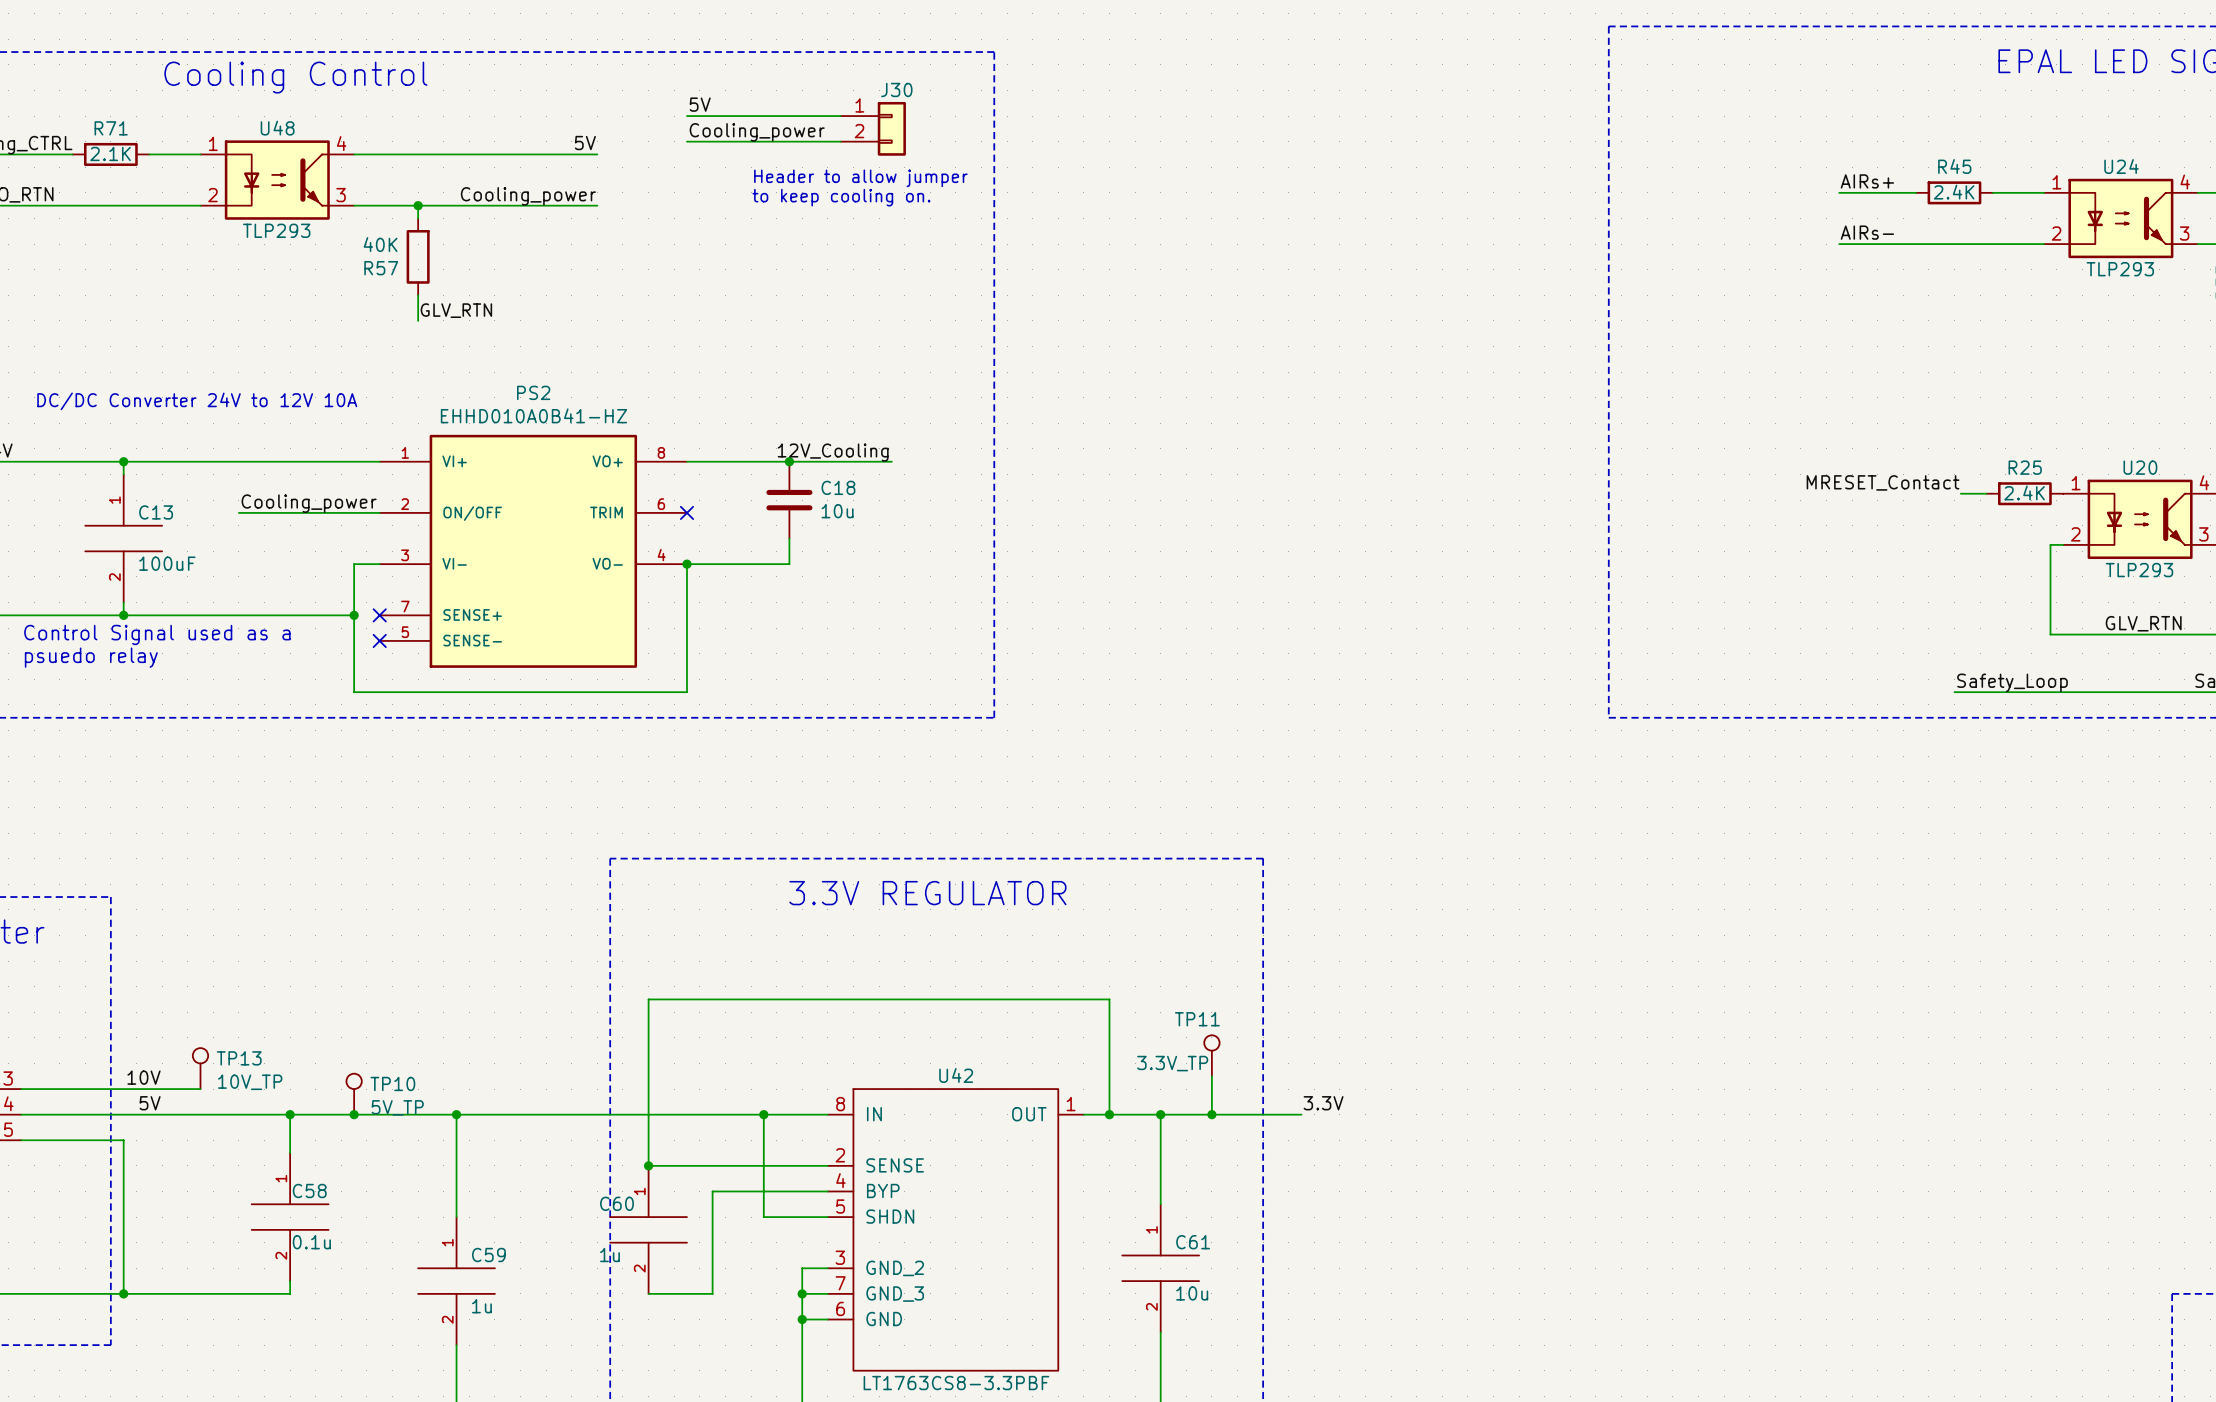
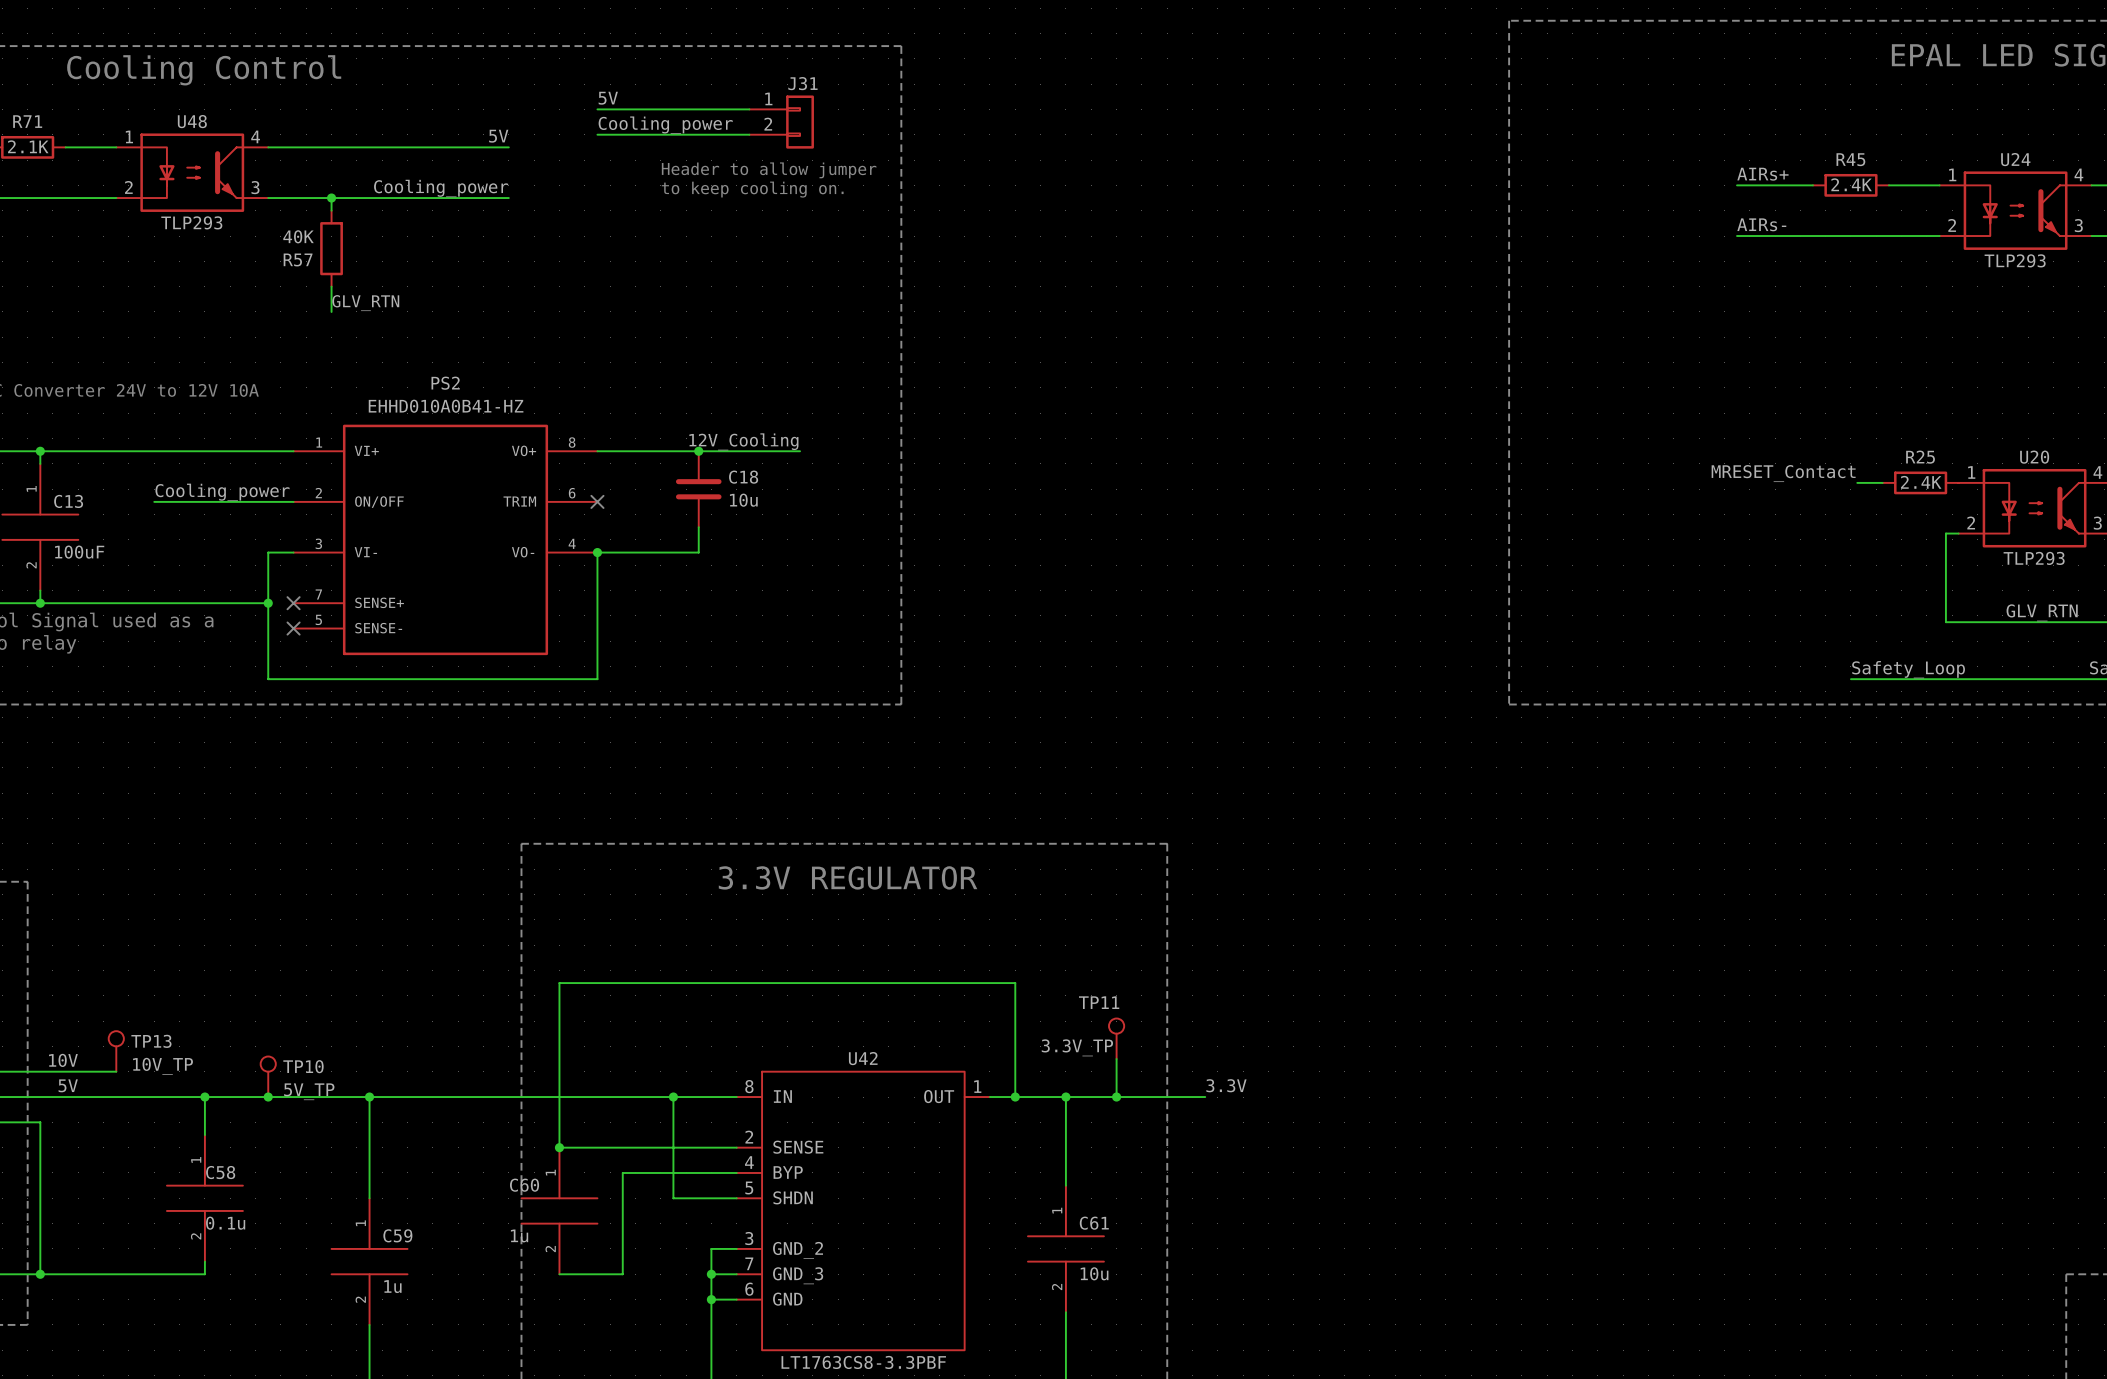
J30 name: J30 (896, 89) -> J31 (802, 83)

